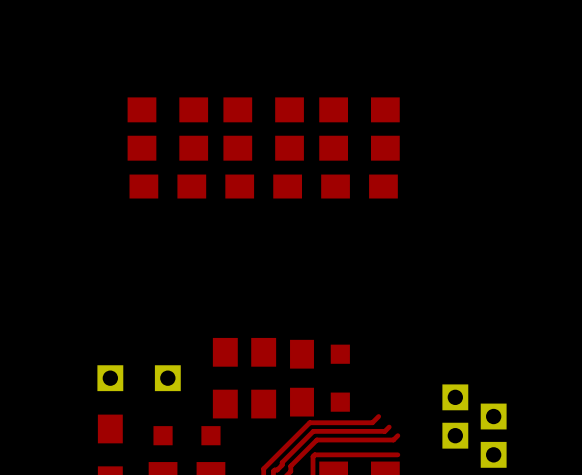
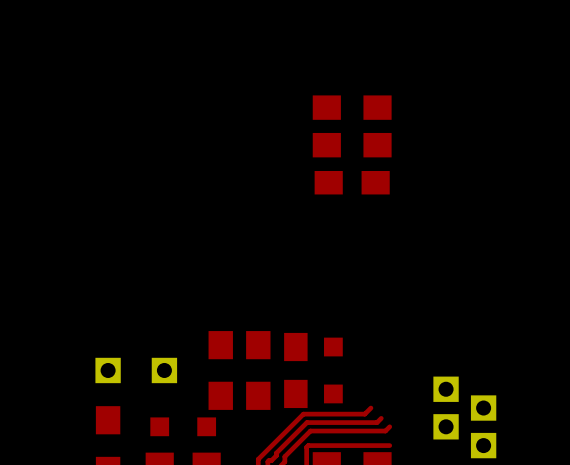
part: (167, 109) -> none
part: (263, 109) -> none
part: (167, 148) -> none
part: (263, 148) -> none
part: (167, 186) -> none
part: (263, 186) -> none

